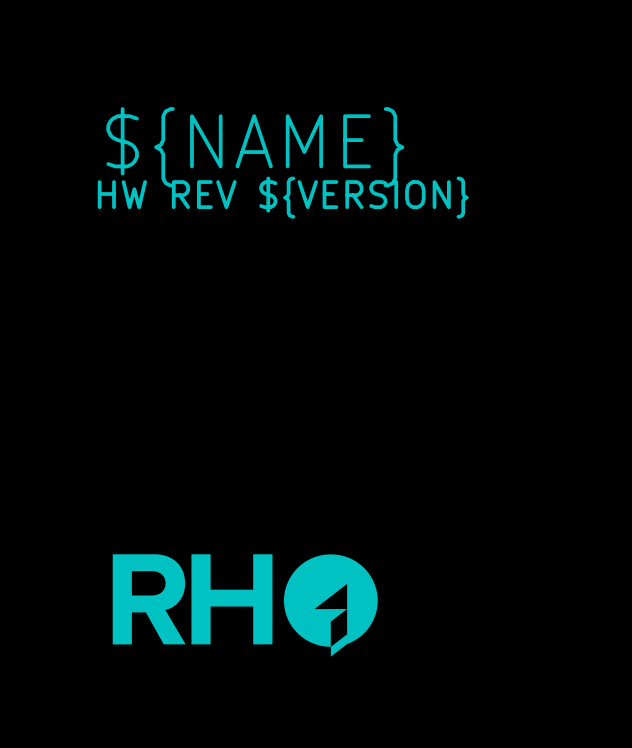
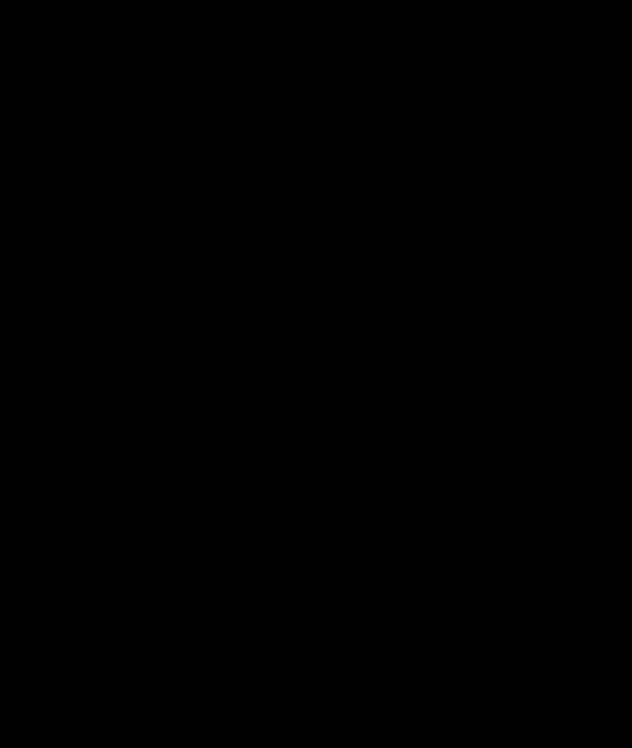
text: ${NAME} (255, 147) -> none
text: HW REV ${VERSION} (283, 197) -> none
drawing: [112, 554, 378, 657] -> none

